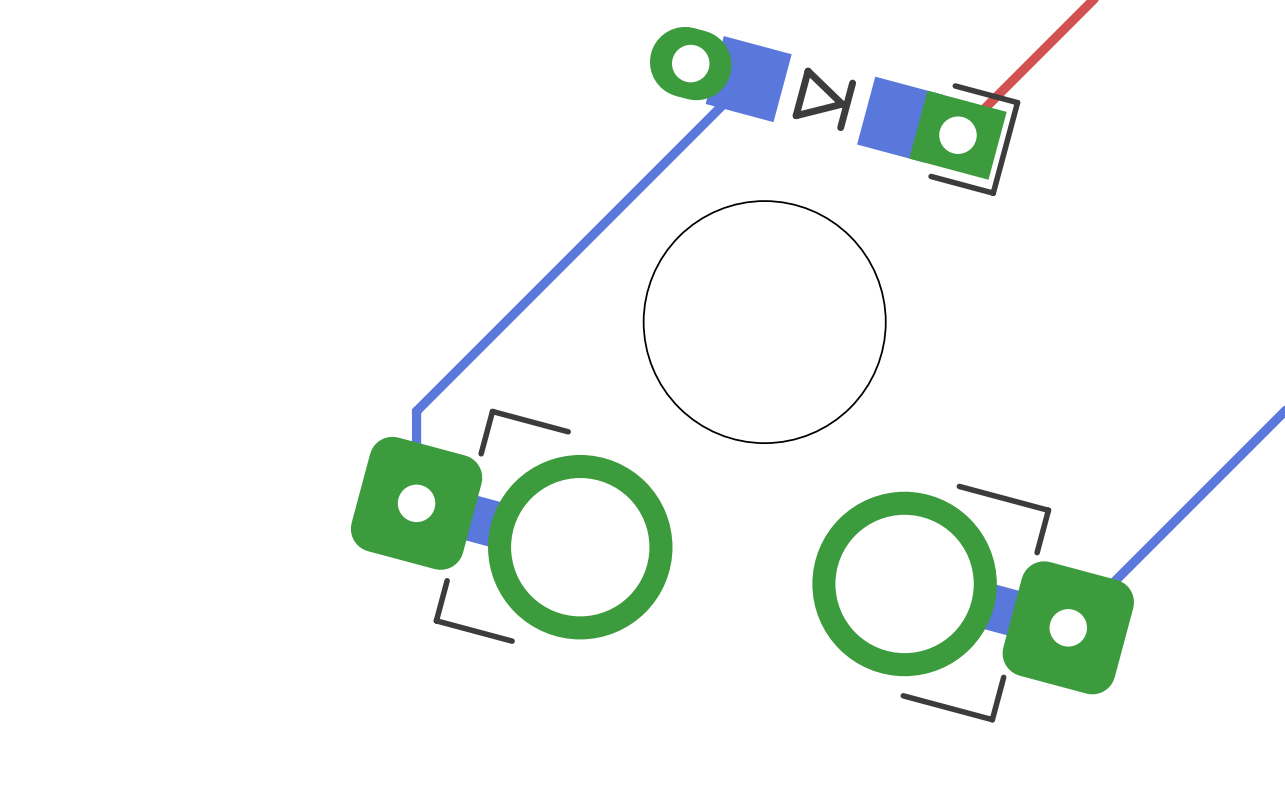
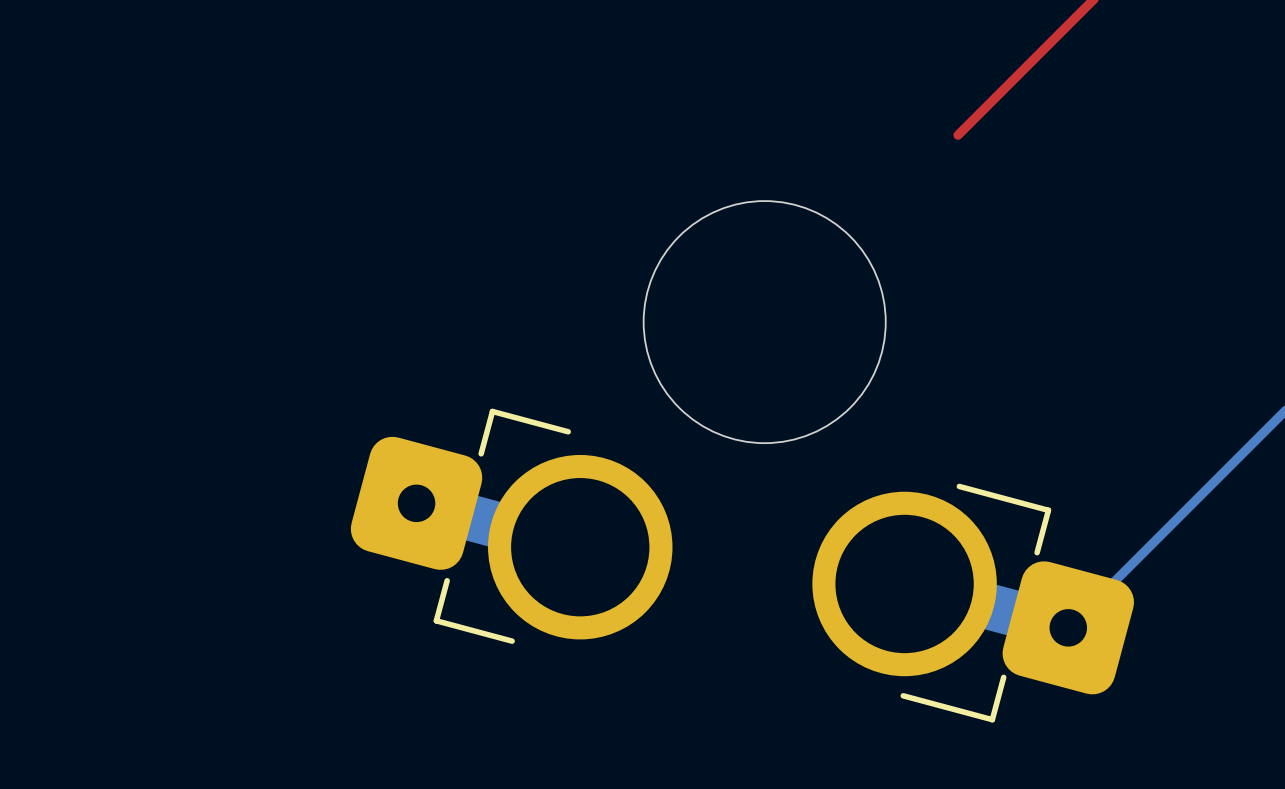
bottom track: (748, 79) (416, 411) (416, 503) -> none
part: (835, 111) -> none

